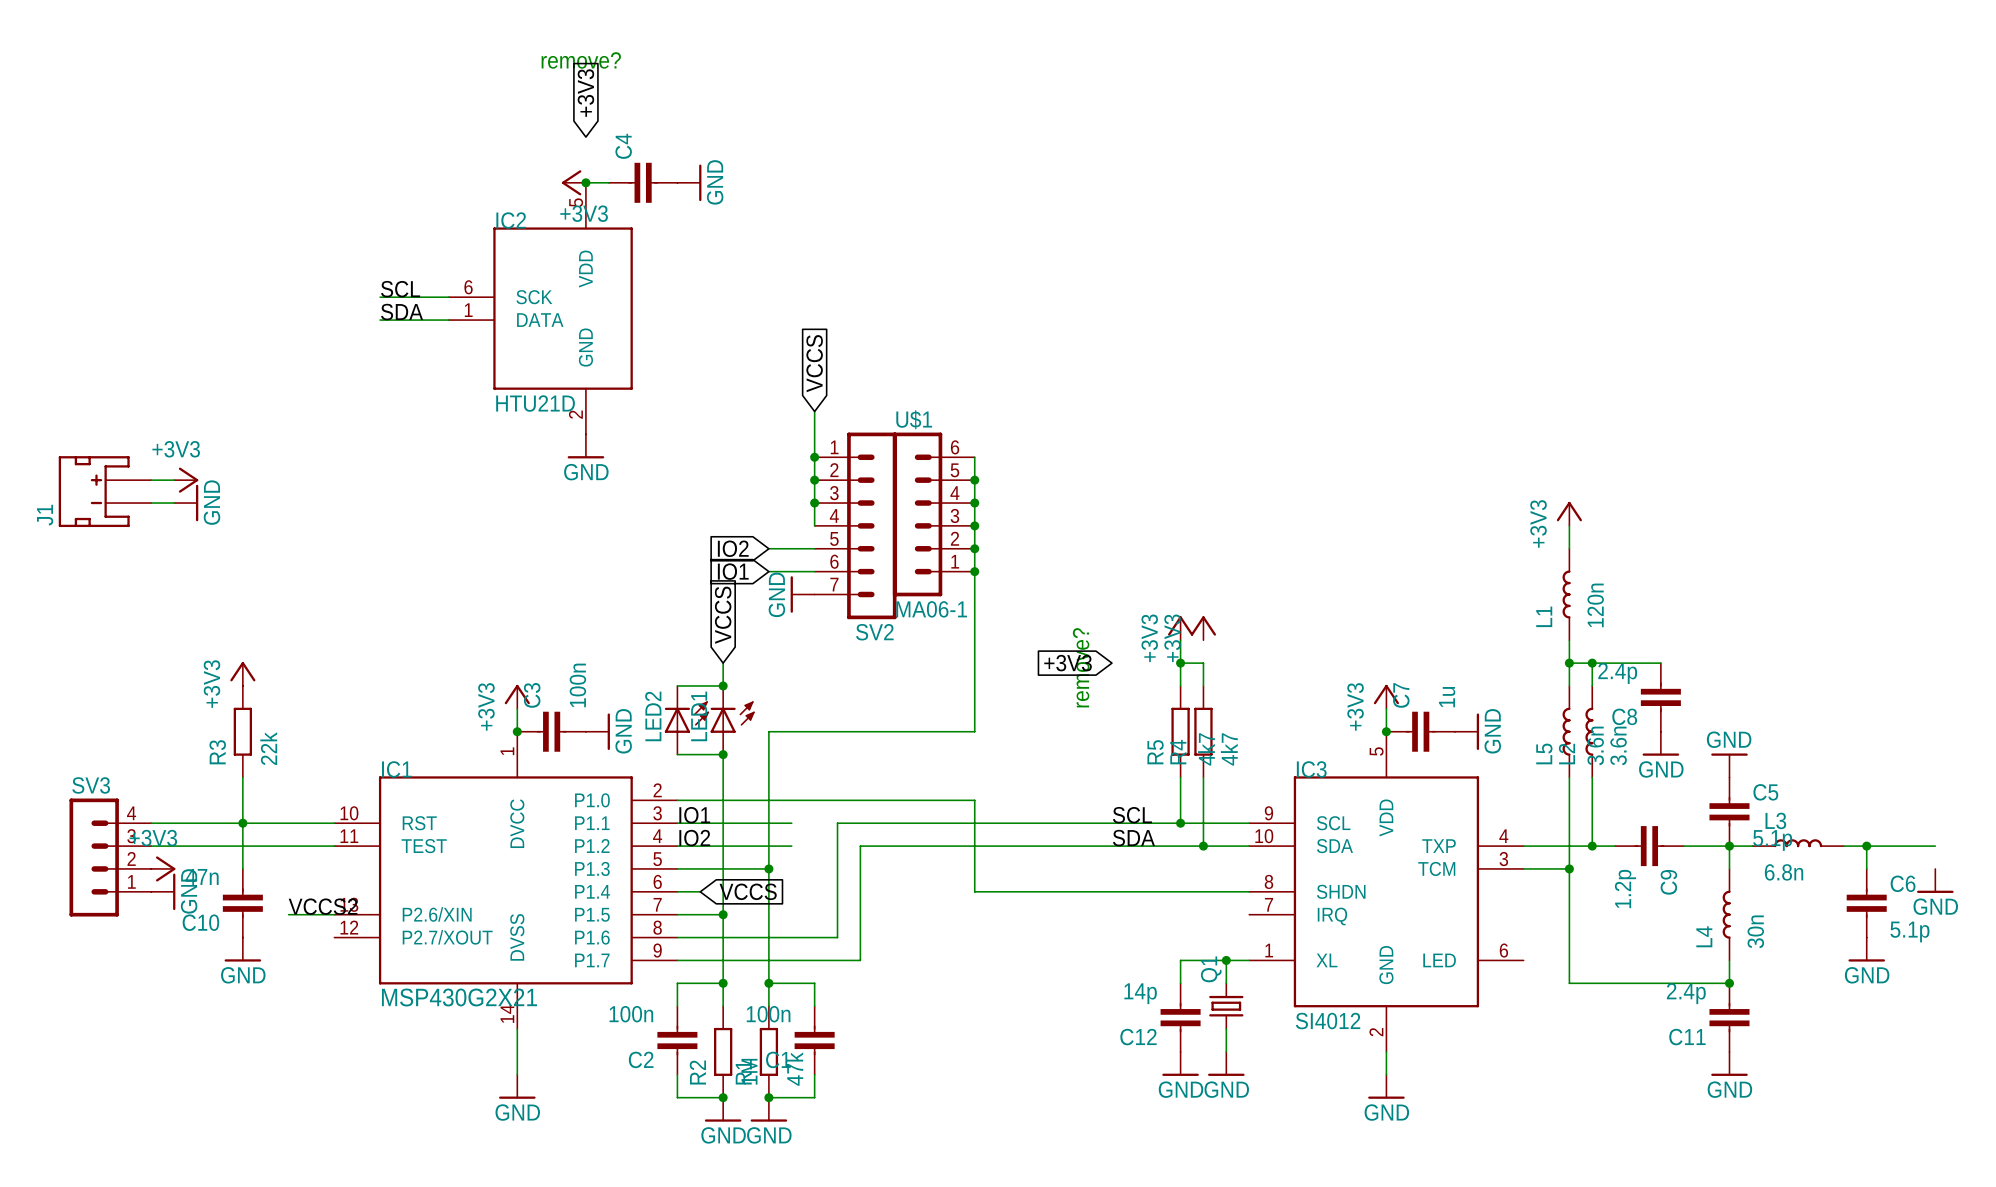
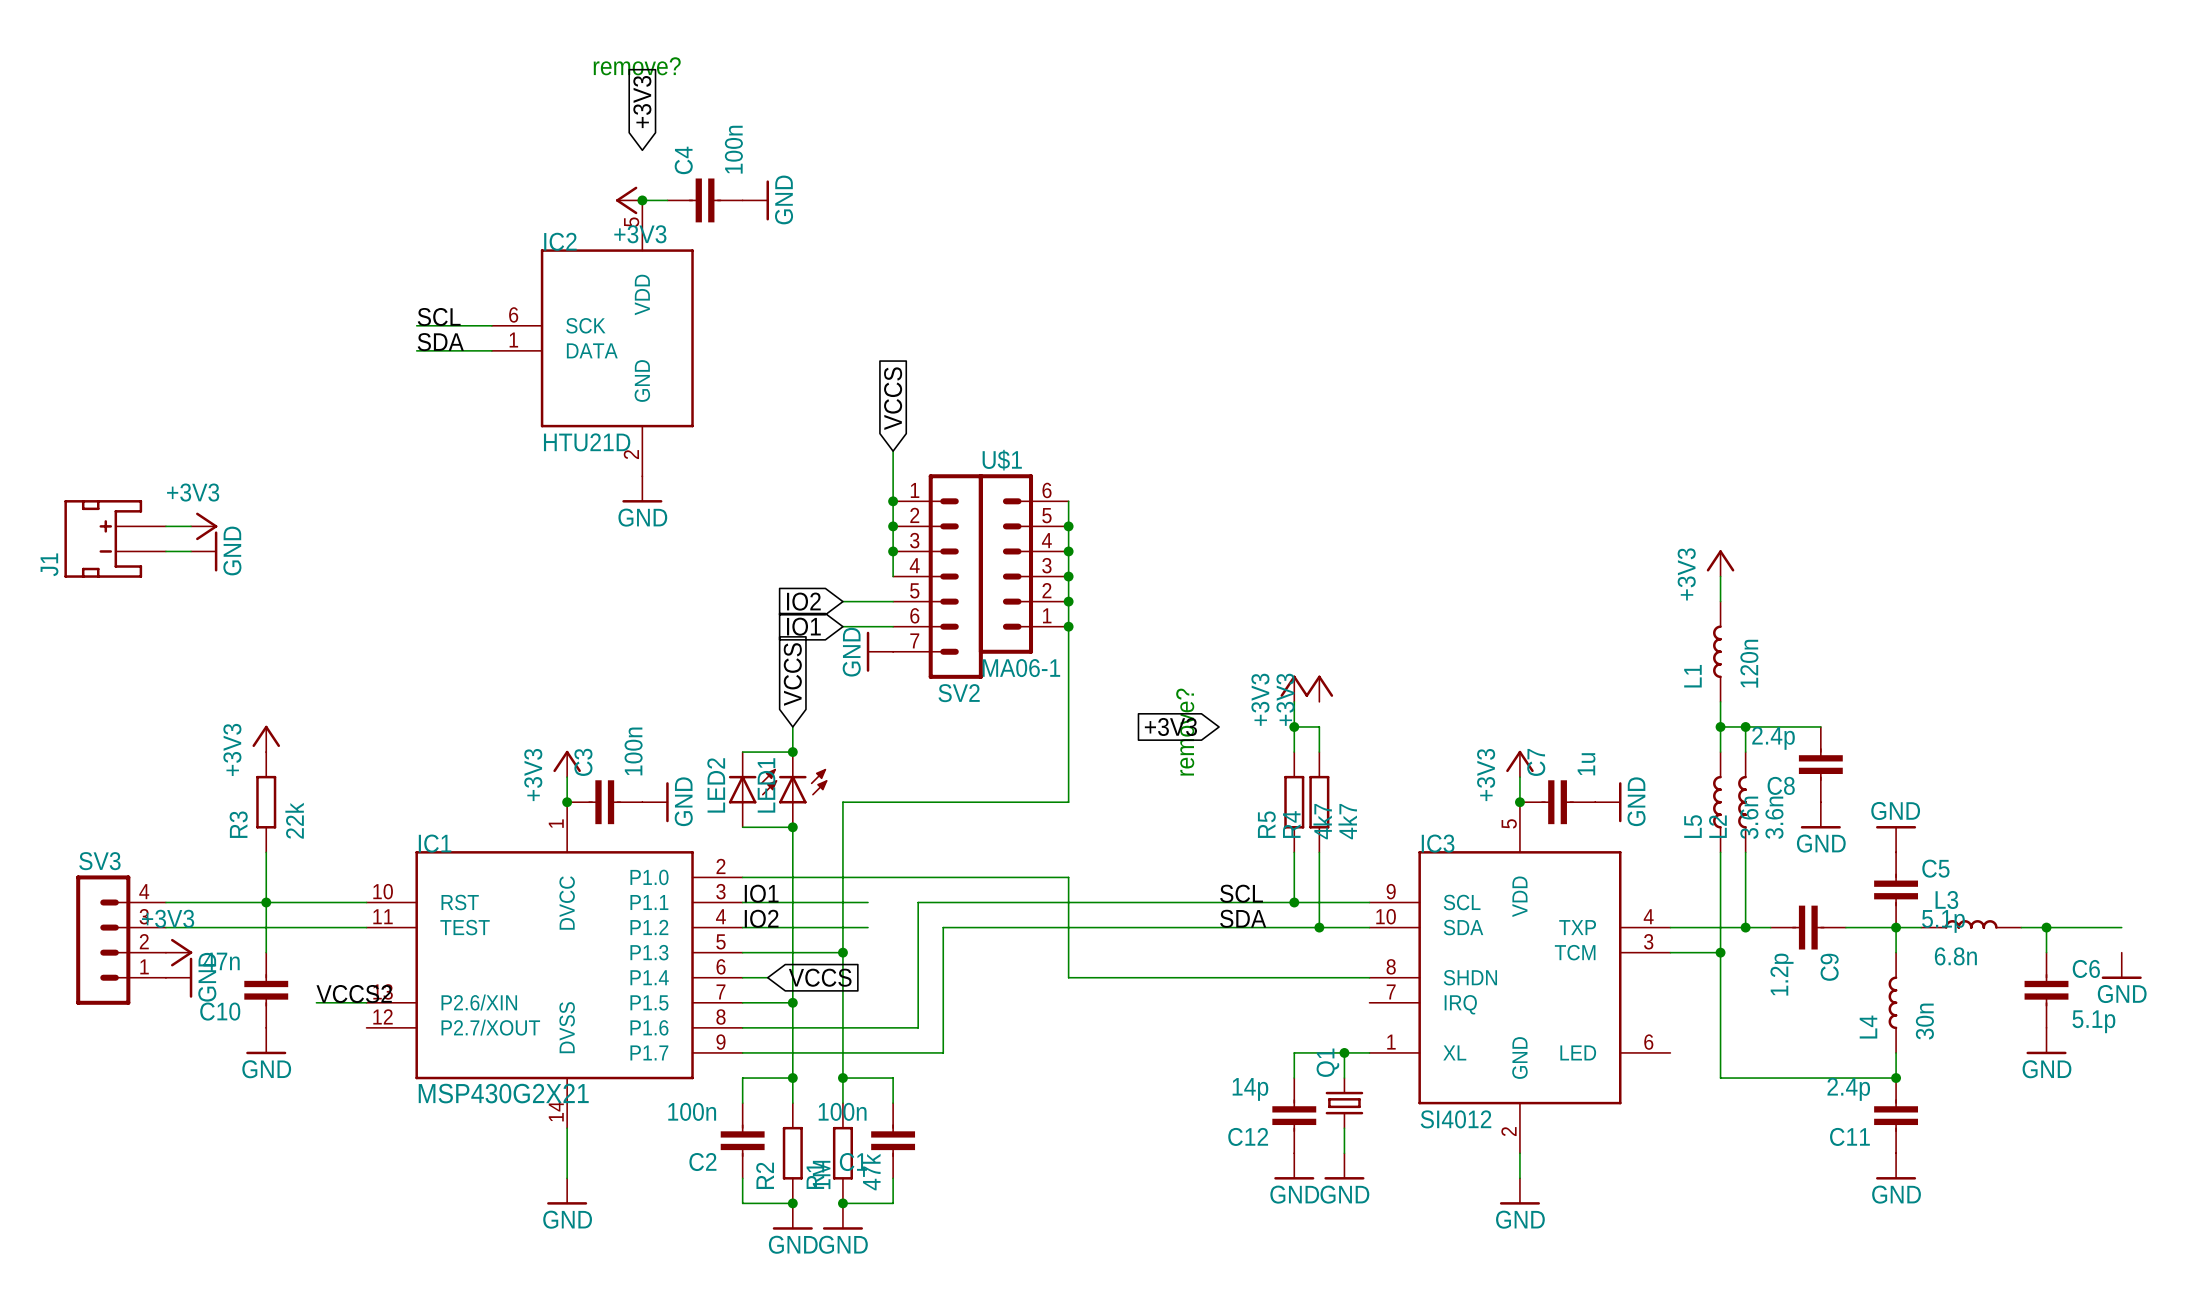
C4 value: none -> 100n (733, 149)

